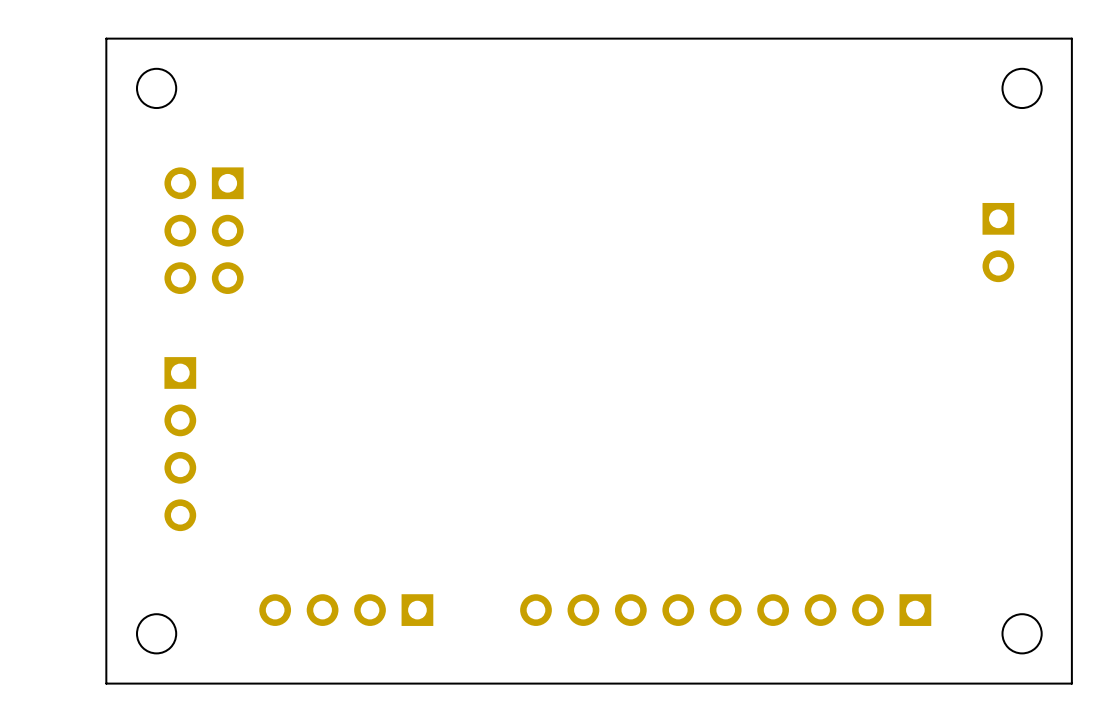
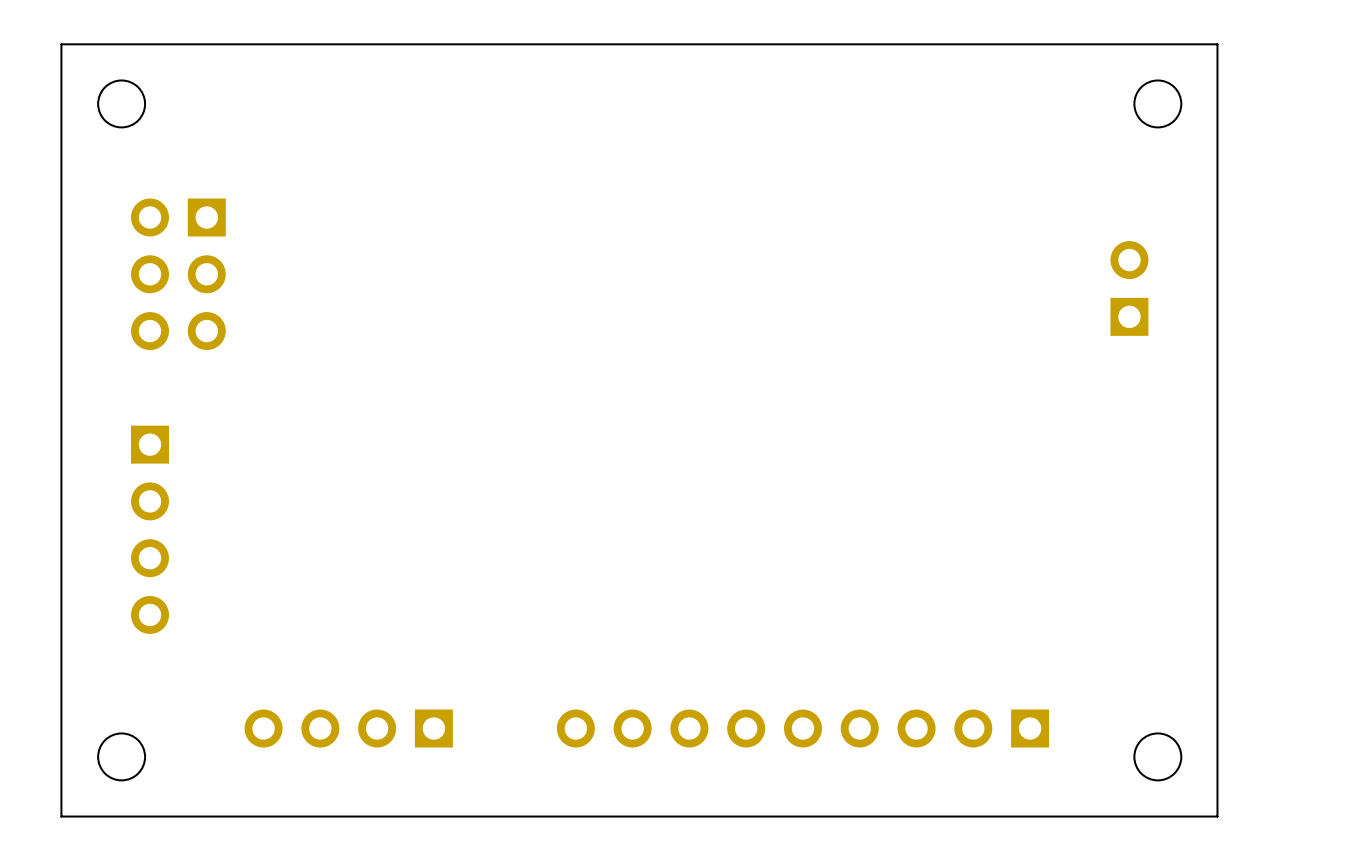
part rotation: 0° (998, 242) -> 180° (1129, 288)

